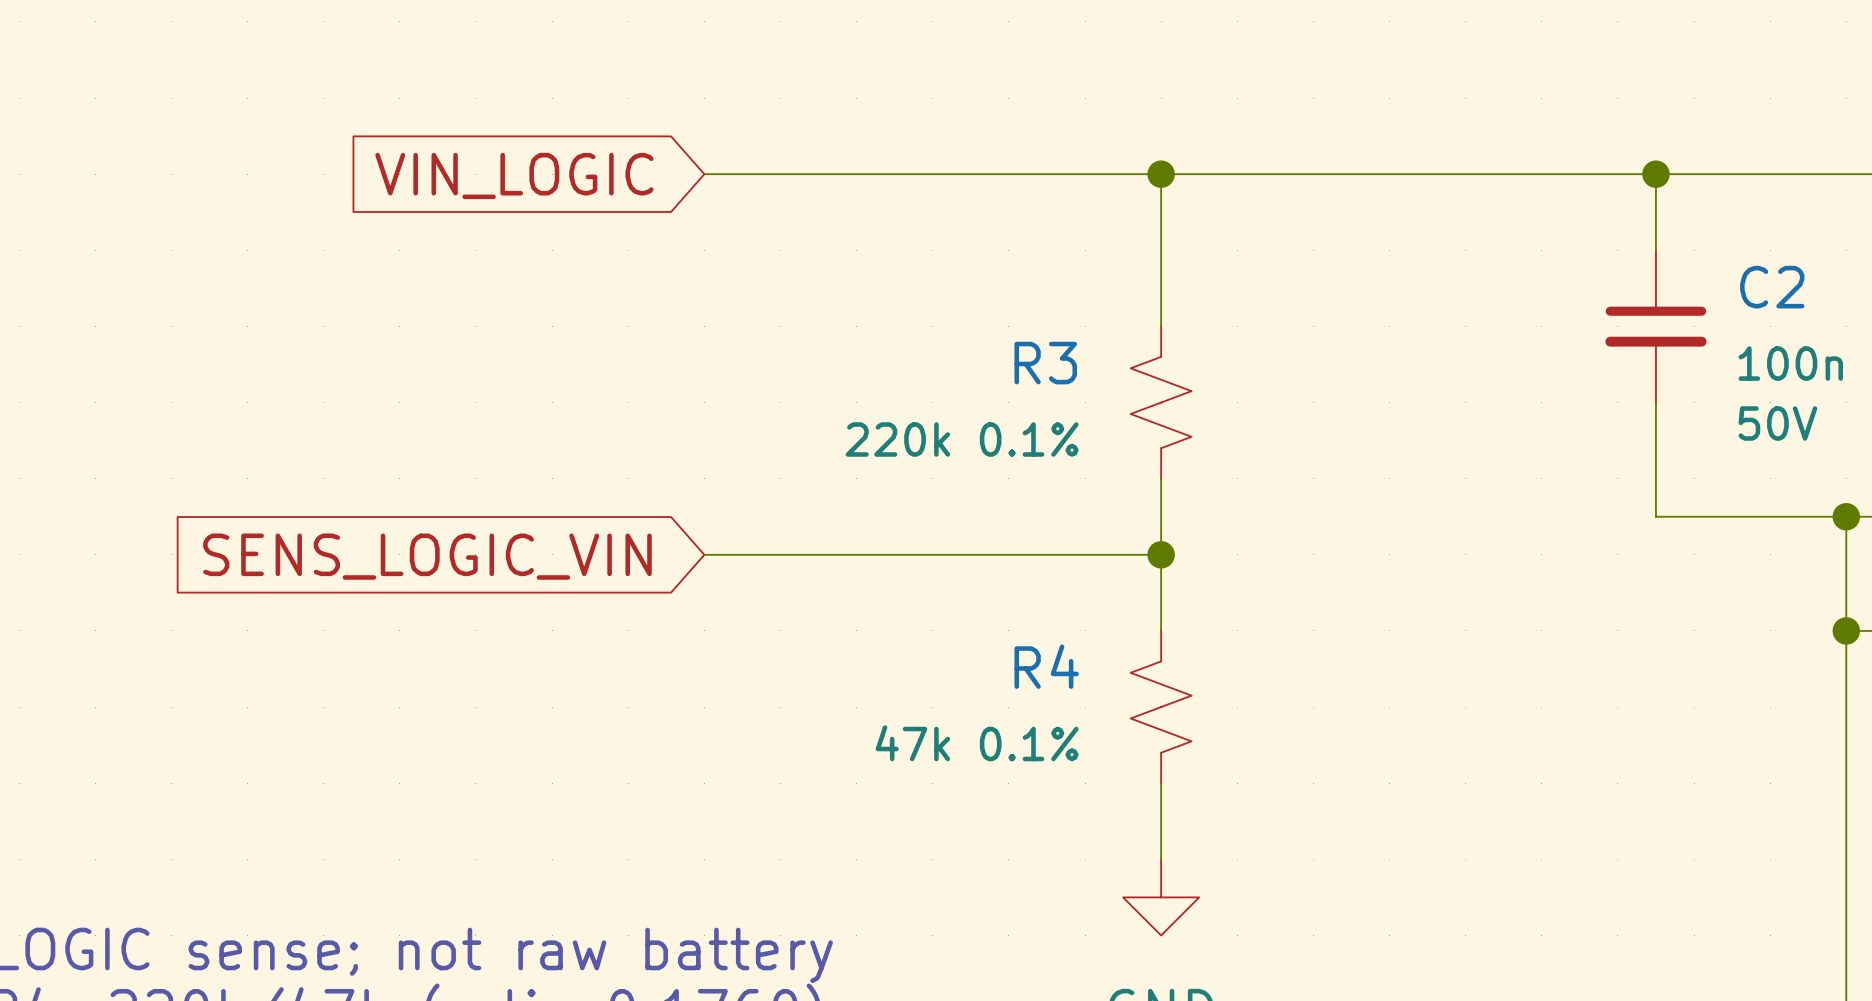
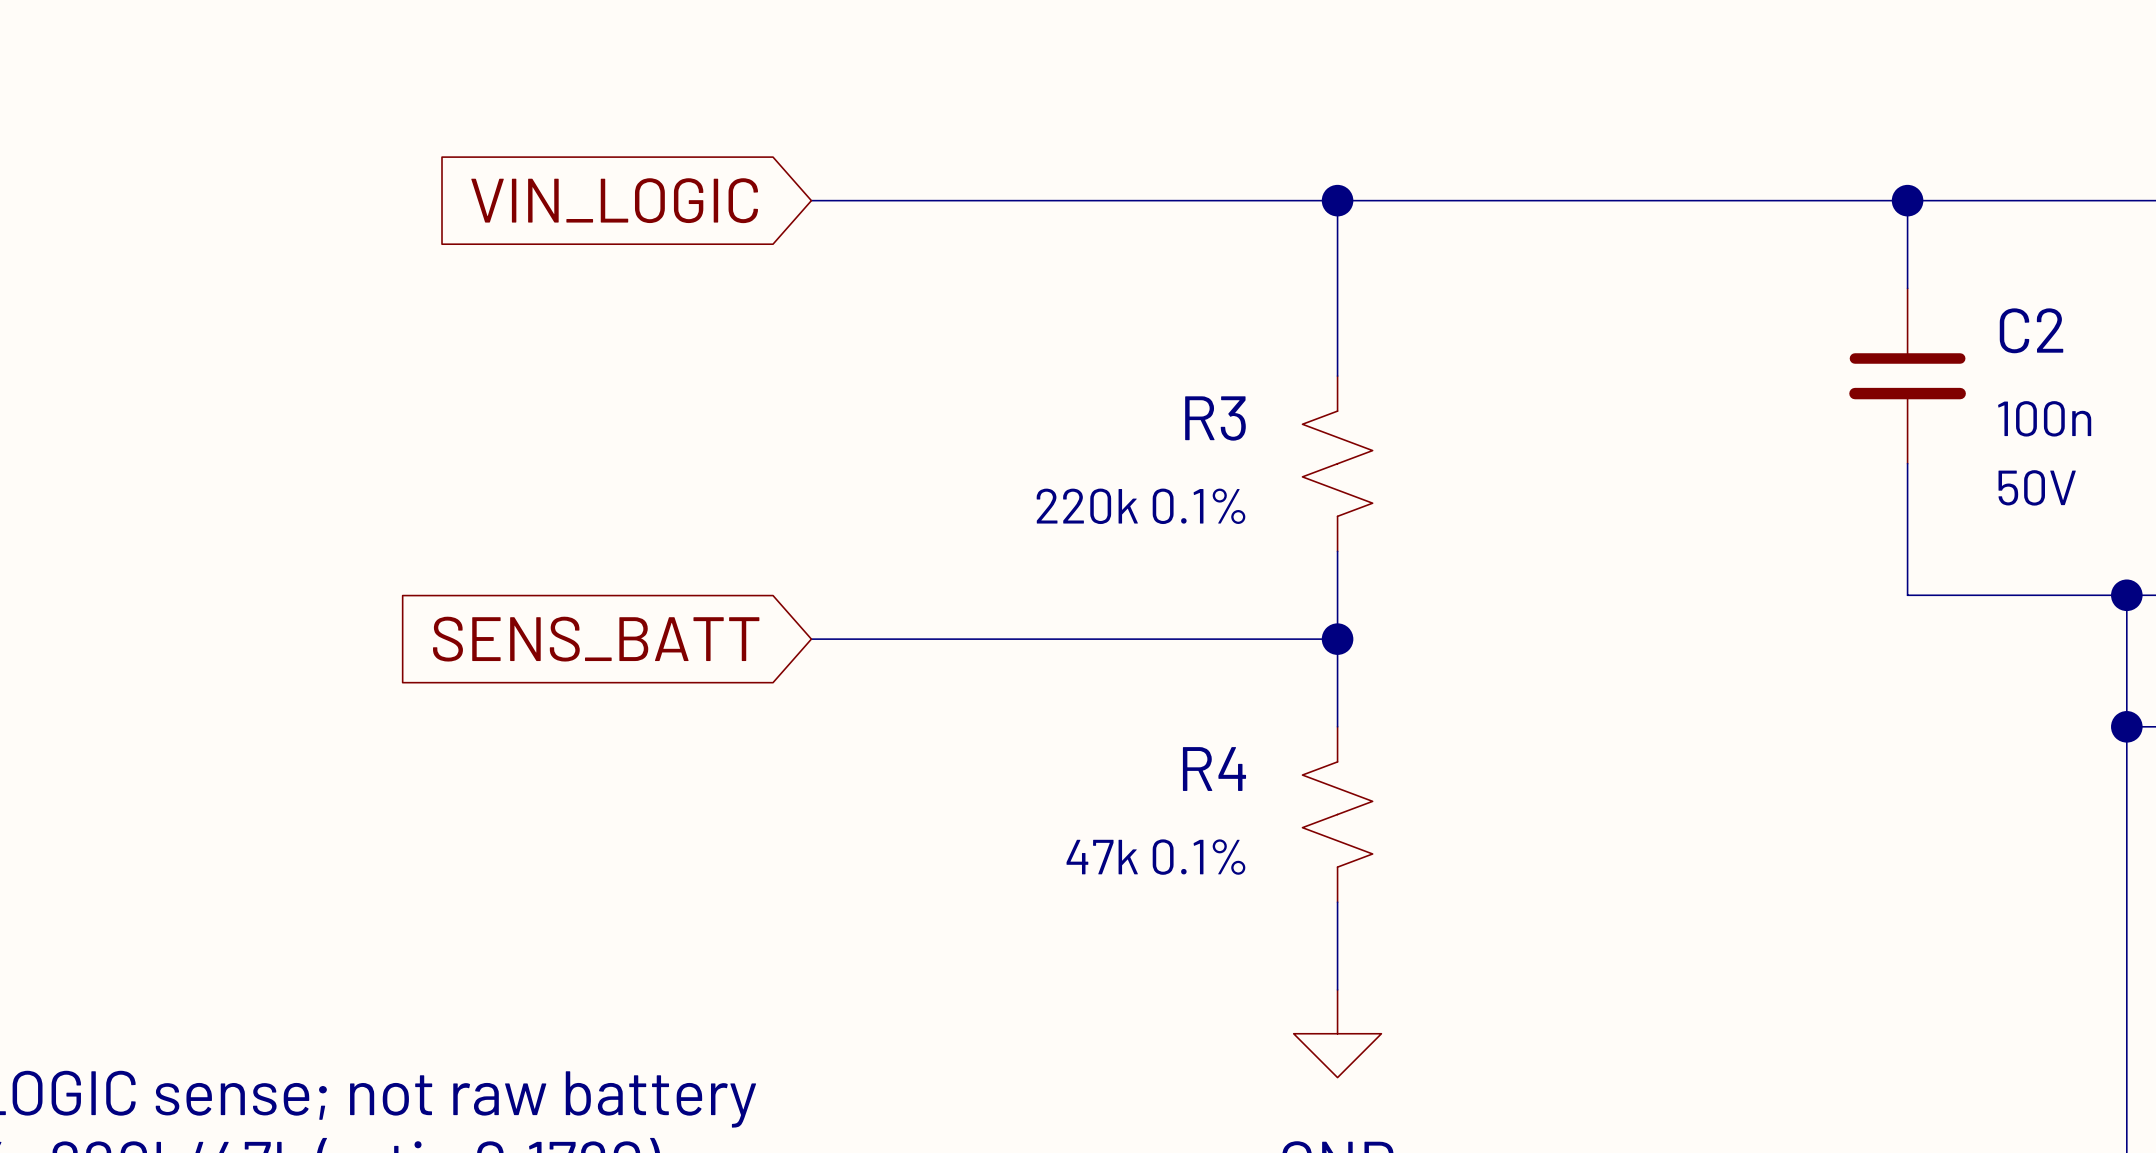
global label: SENS_LOGIC_VIN (427, 556) -> SENS_BATT (596, 639)

